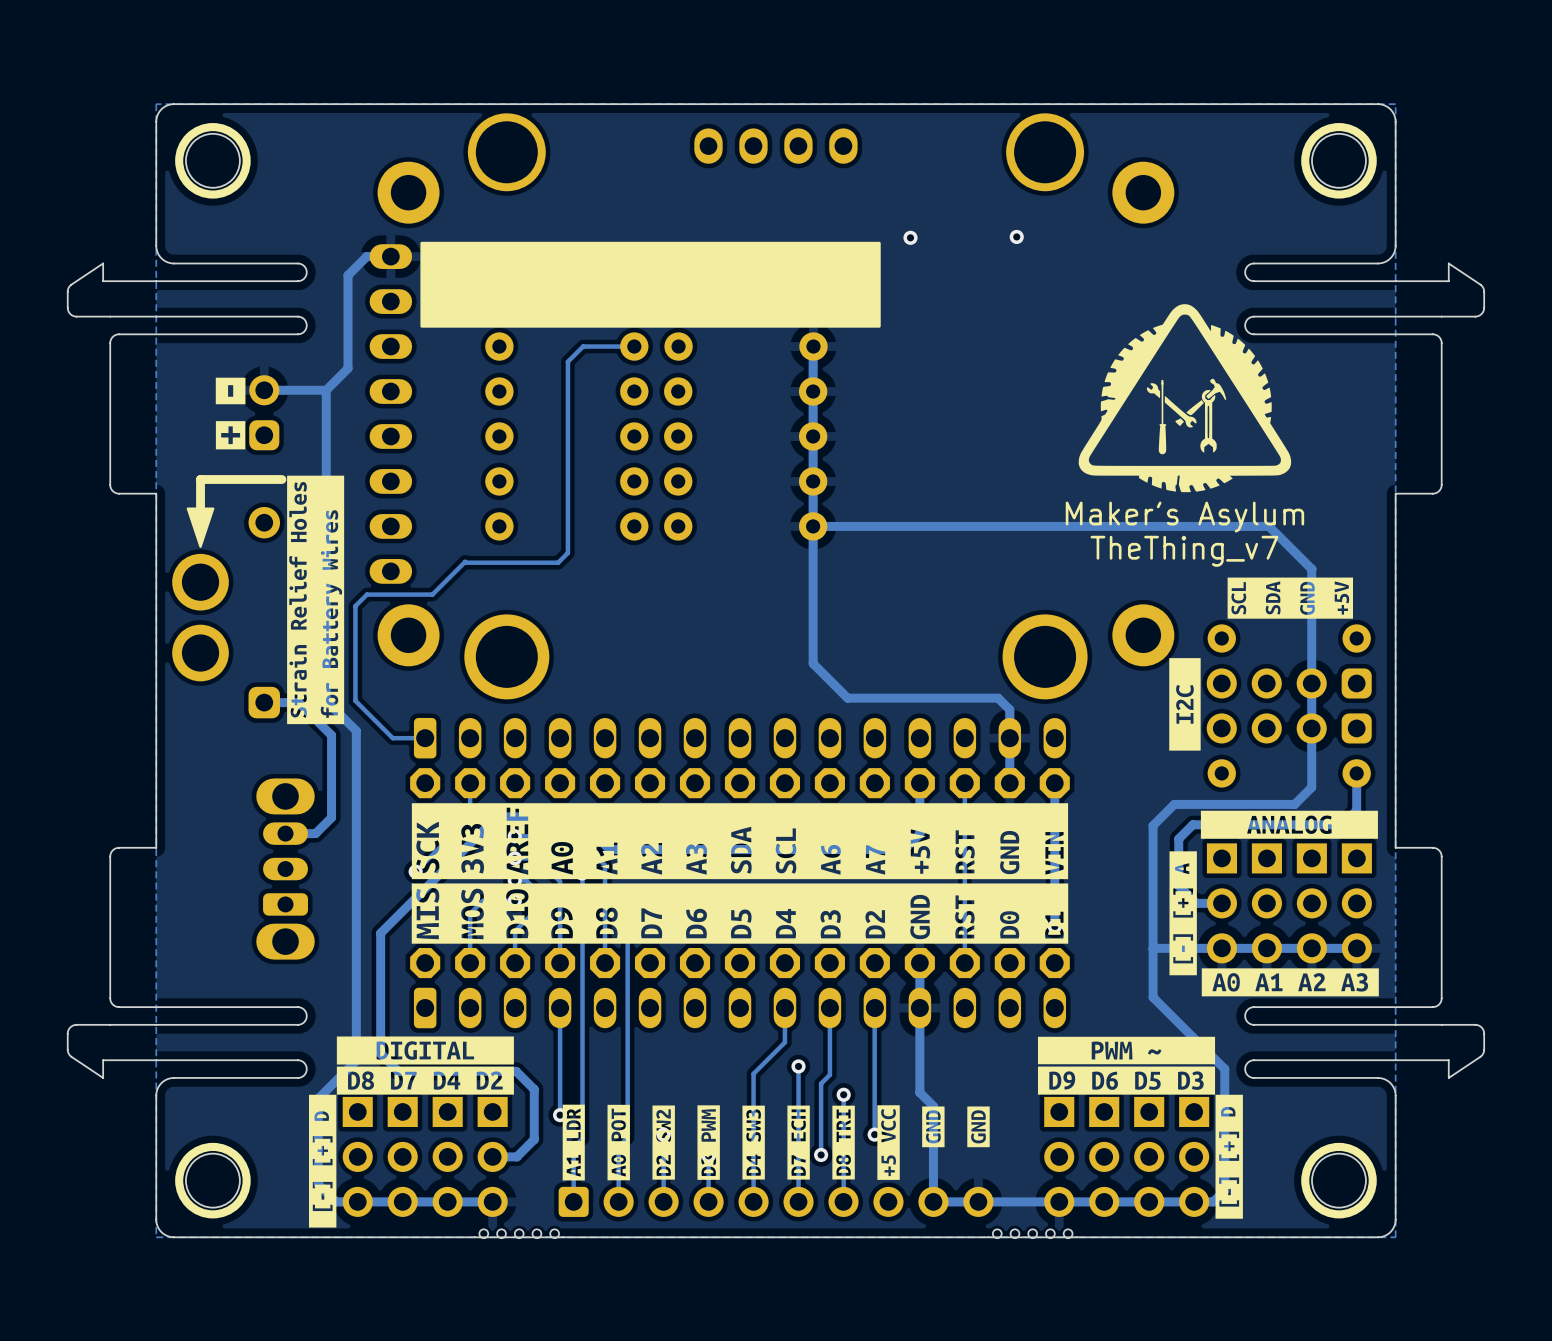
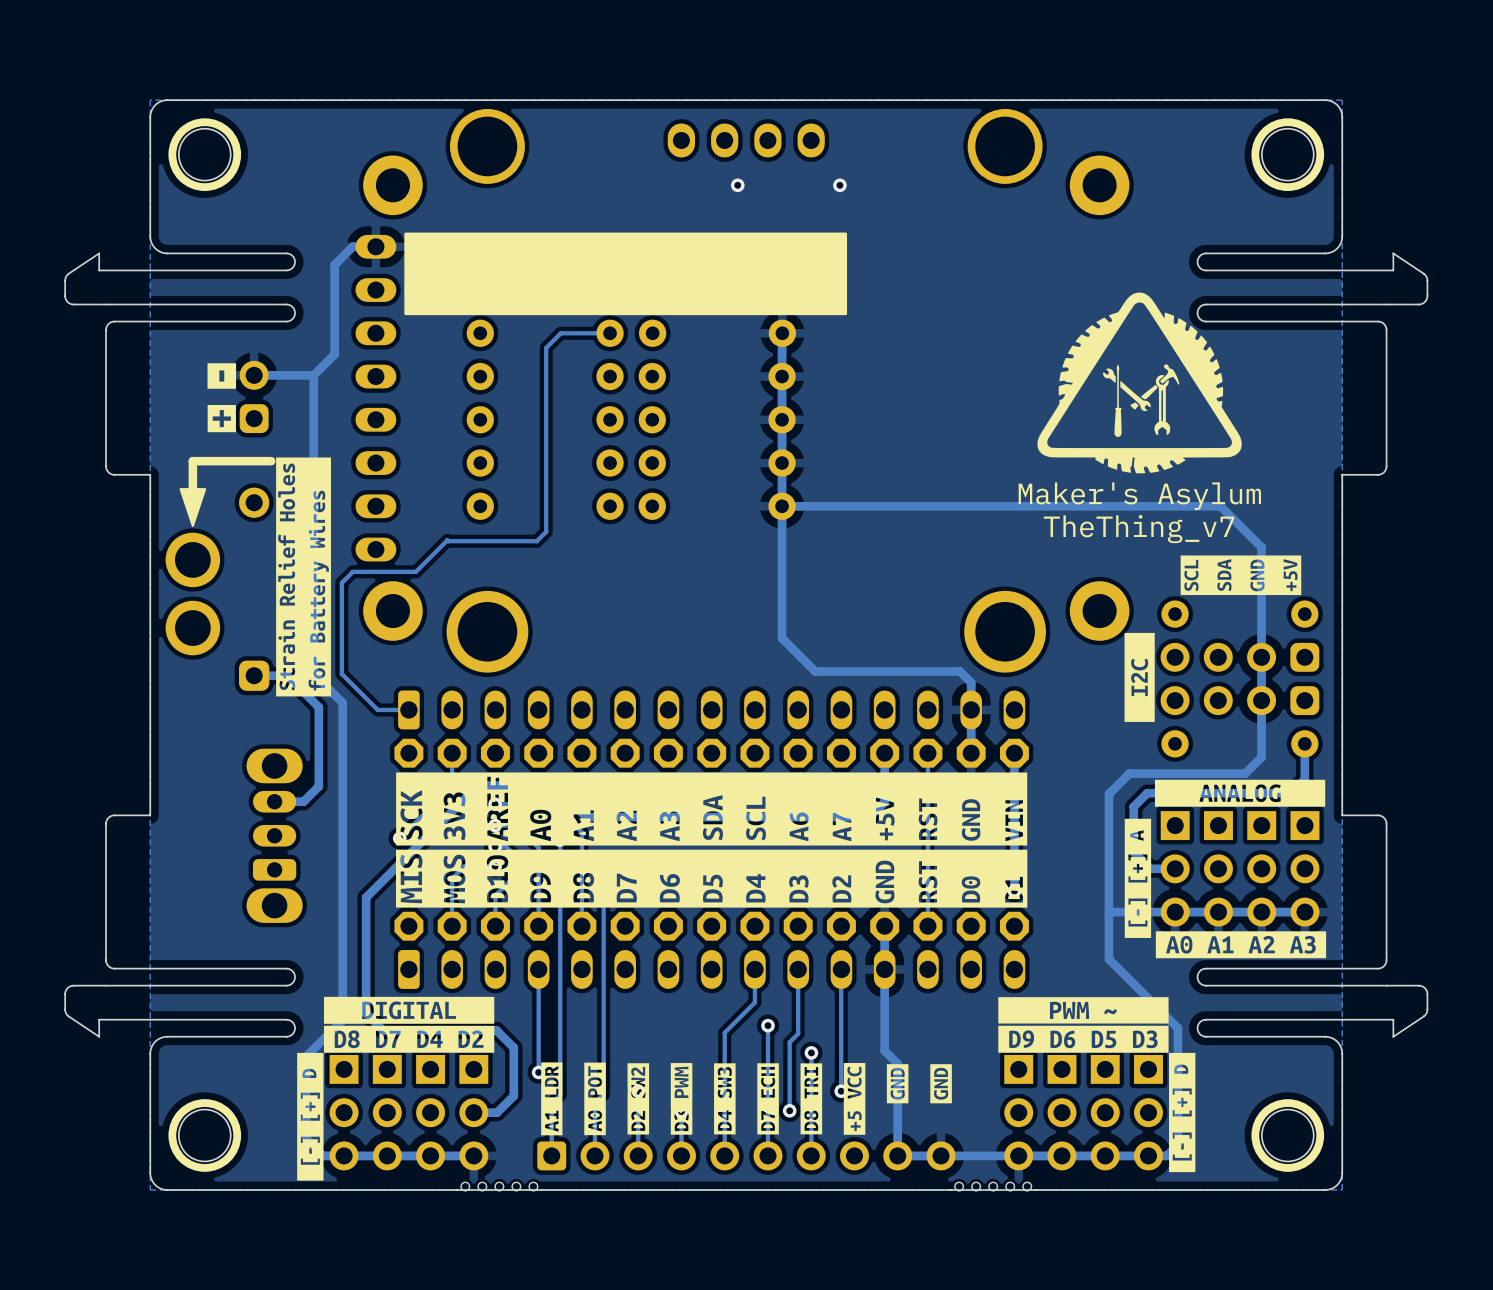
via: none -> (737, 185)
via: (1016, 236) -> none
via position: (910, 237) -> (839, 185)

